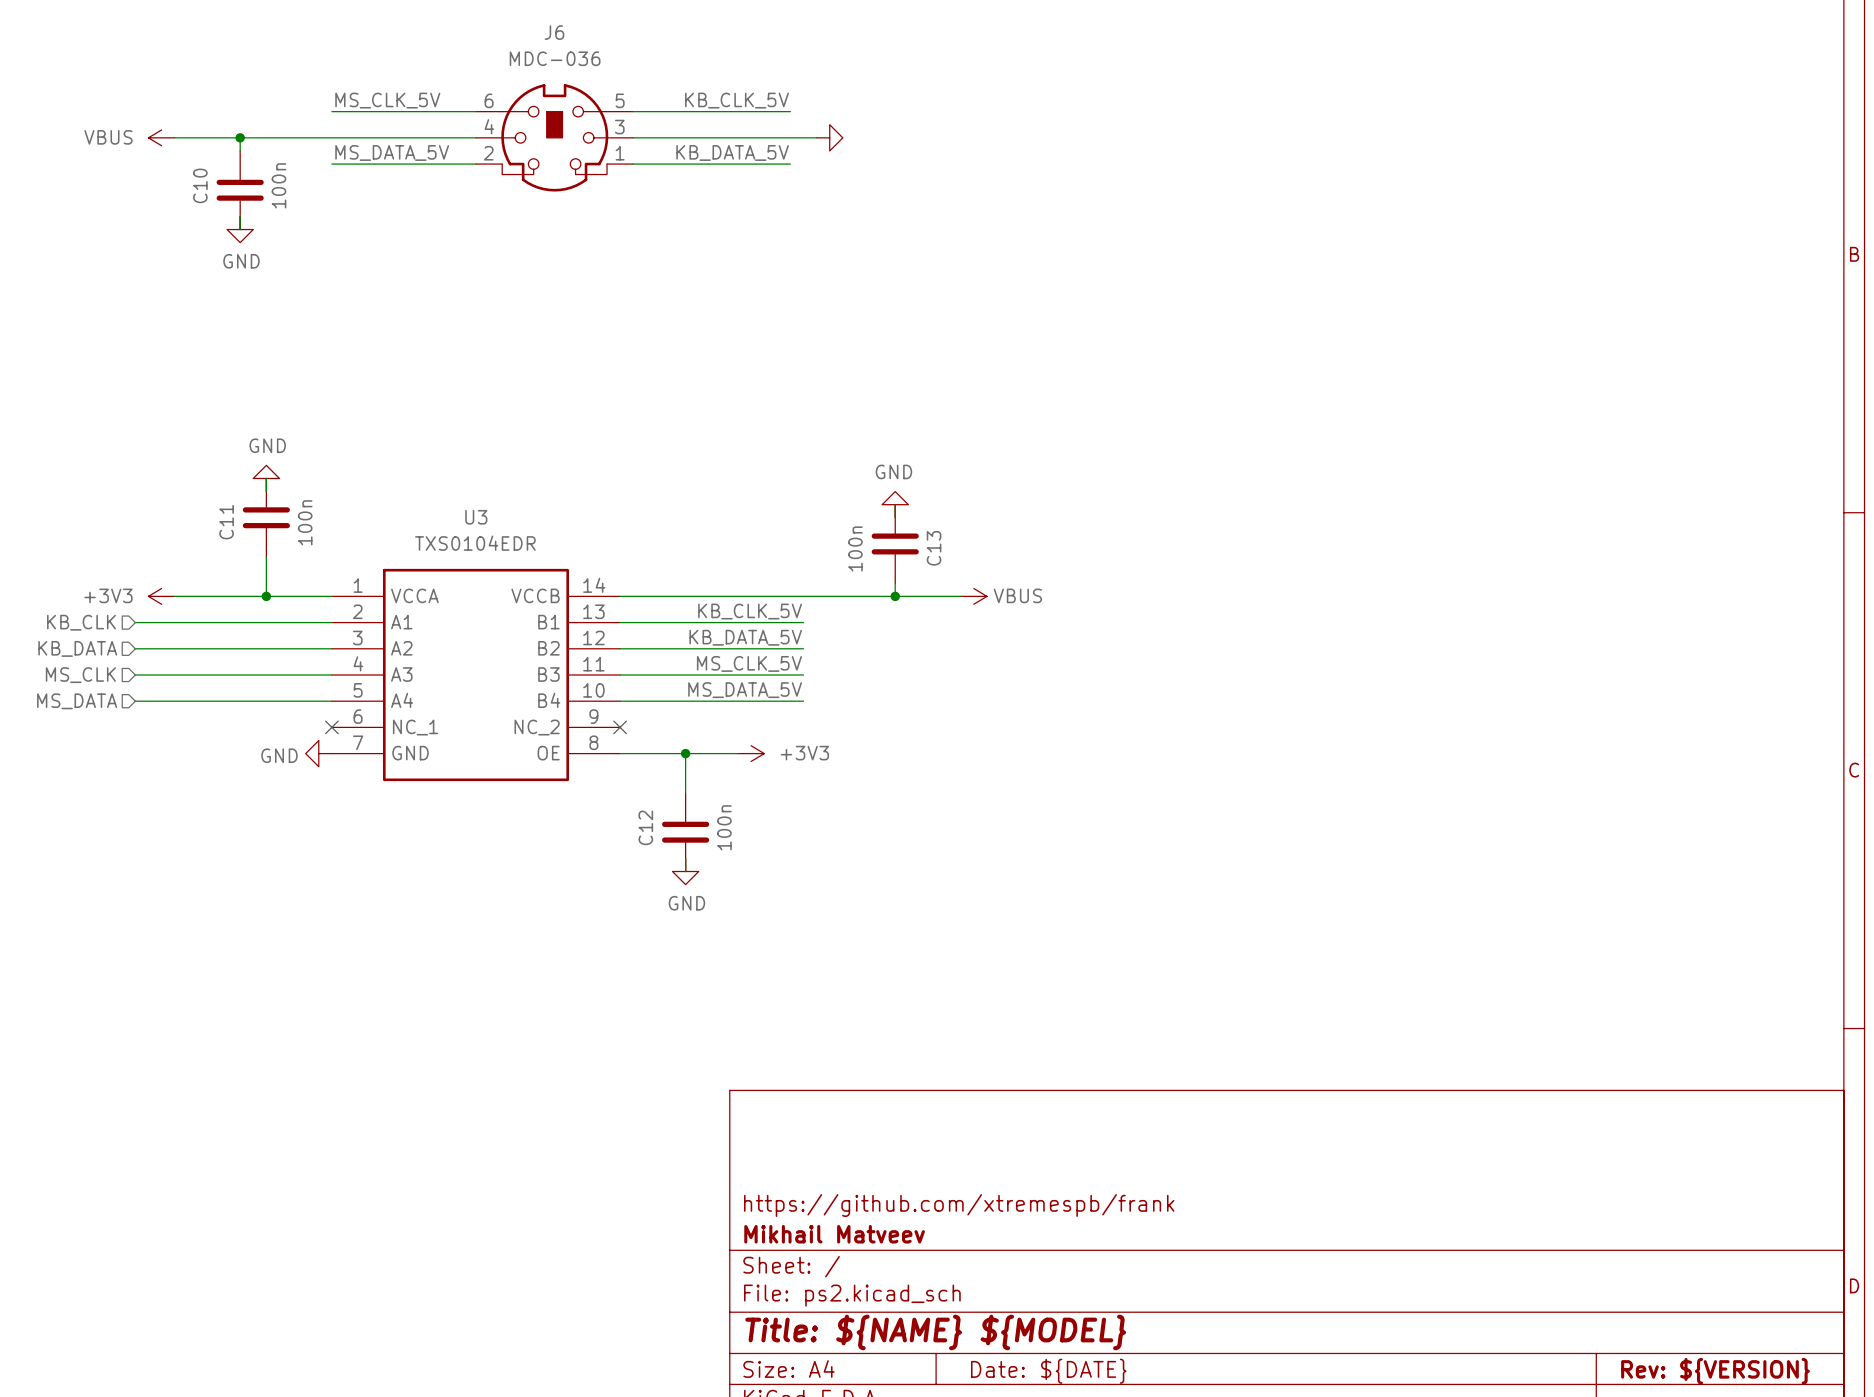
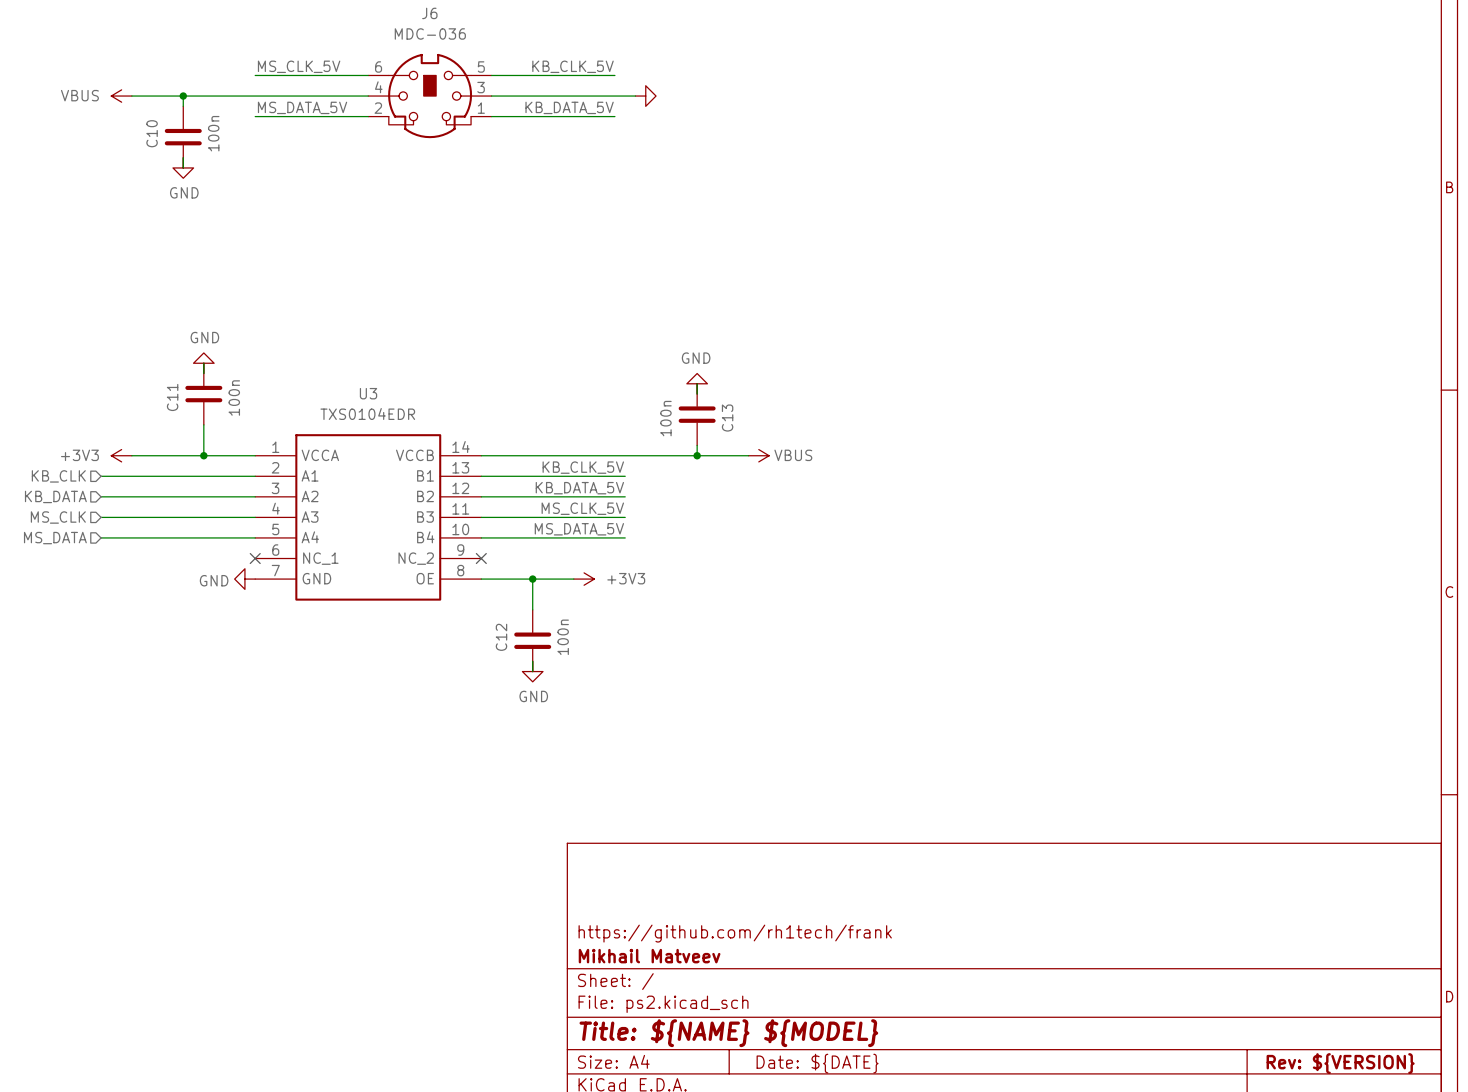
title block: https://github.com/xtremespb/frank (959, 1205) -> https://github.com/rh1tech/frank (735, 933)

